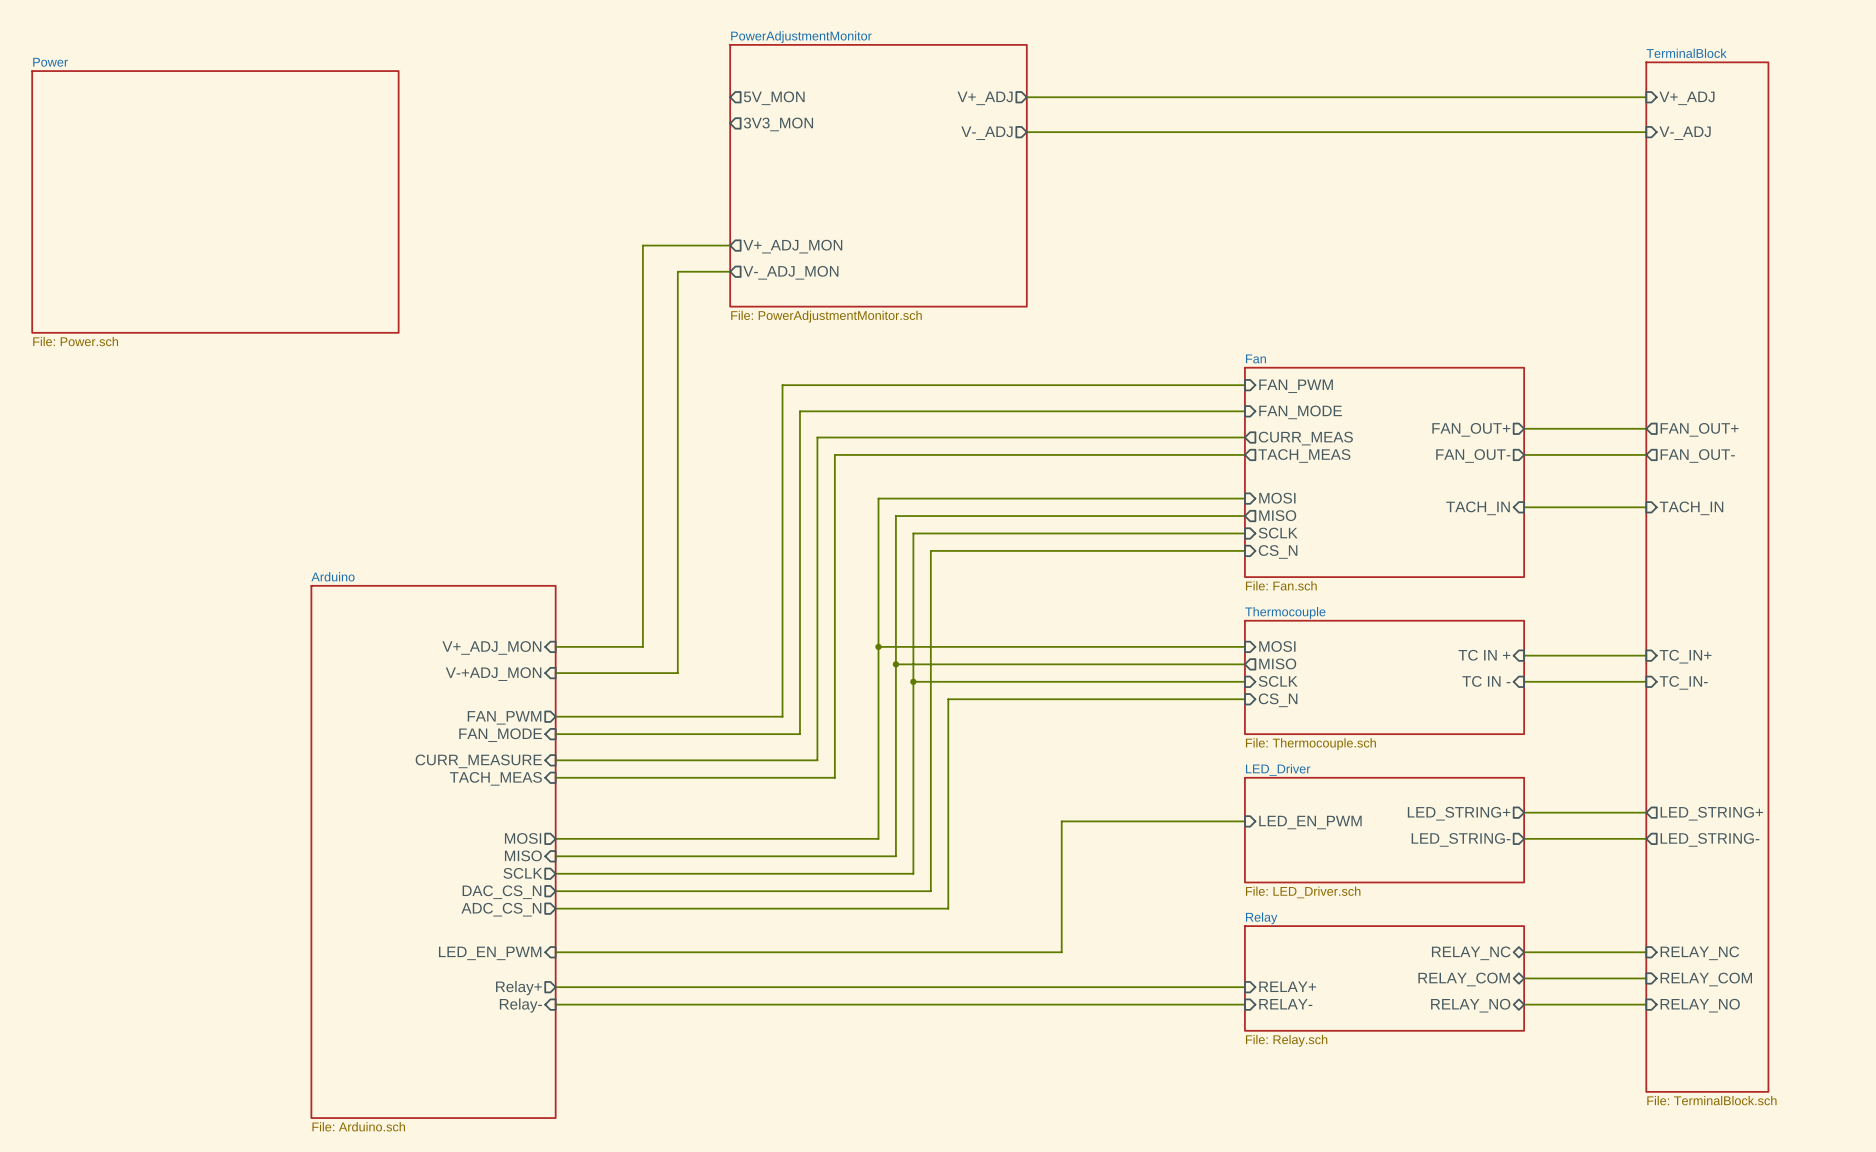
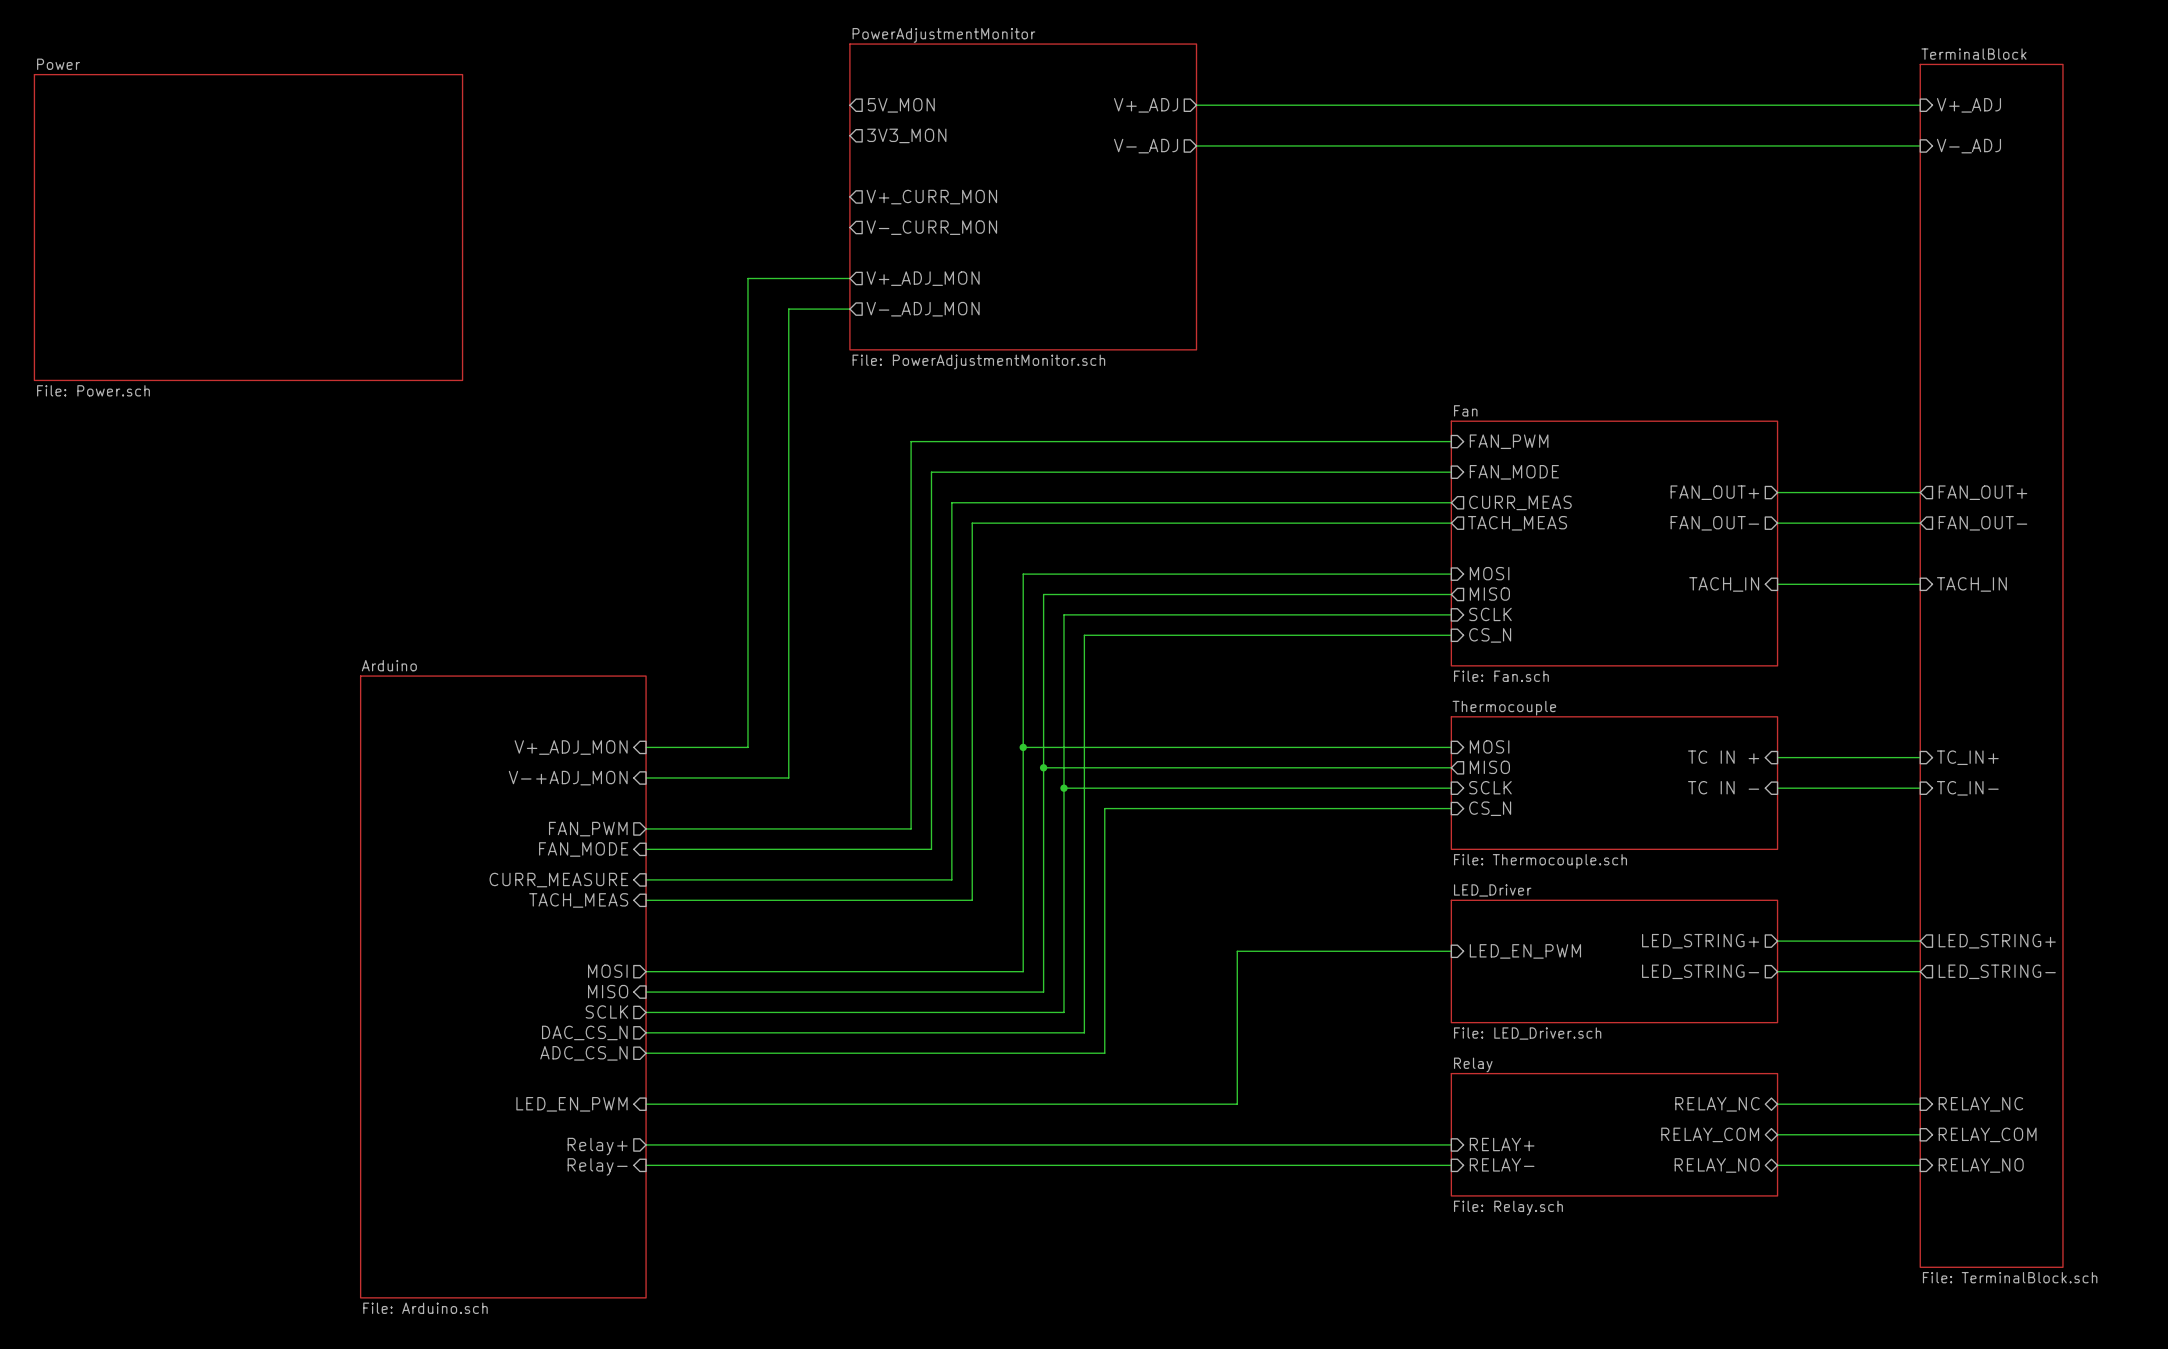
sheet pin: none -> V+_CURR_MON (931, 197)
sheet pin: none -> V-_CURR_MON (931, 227)

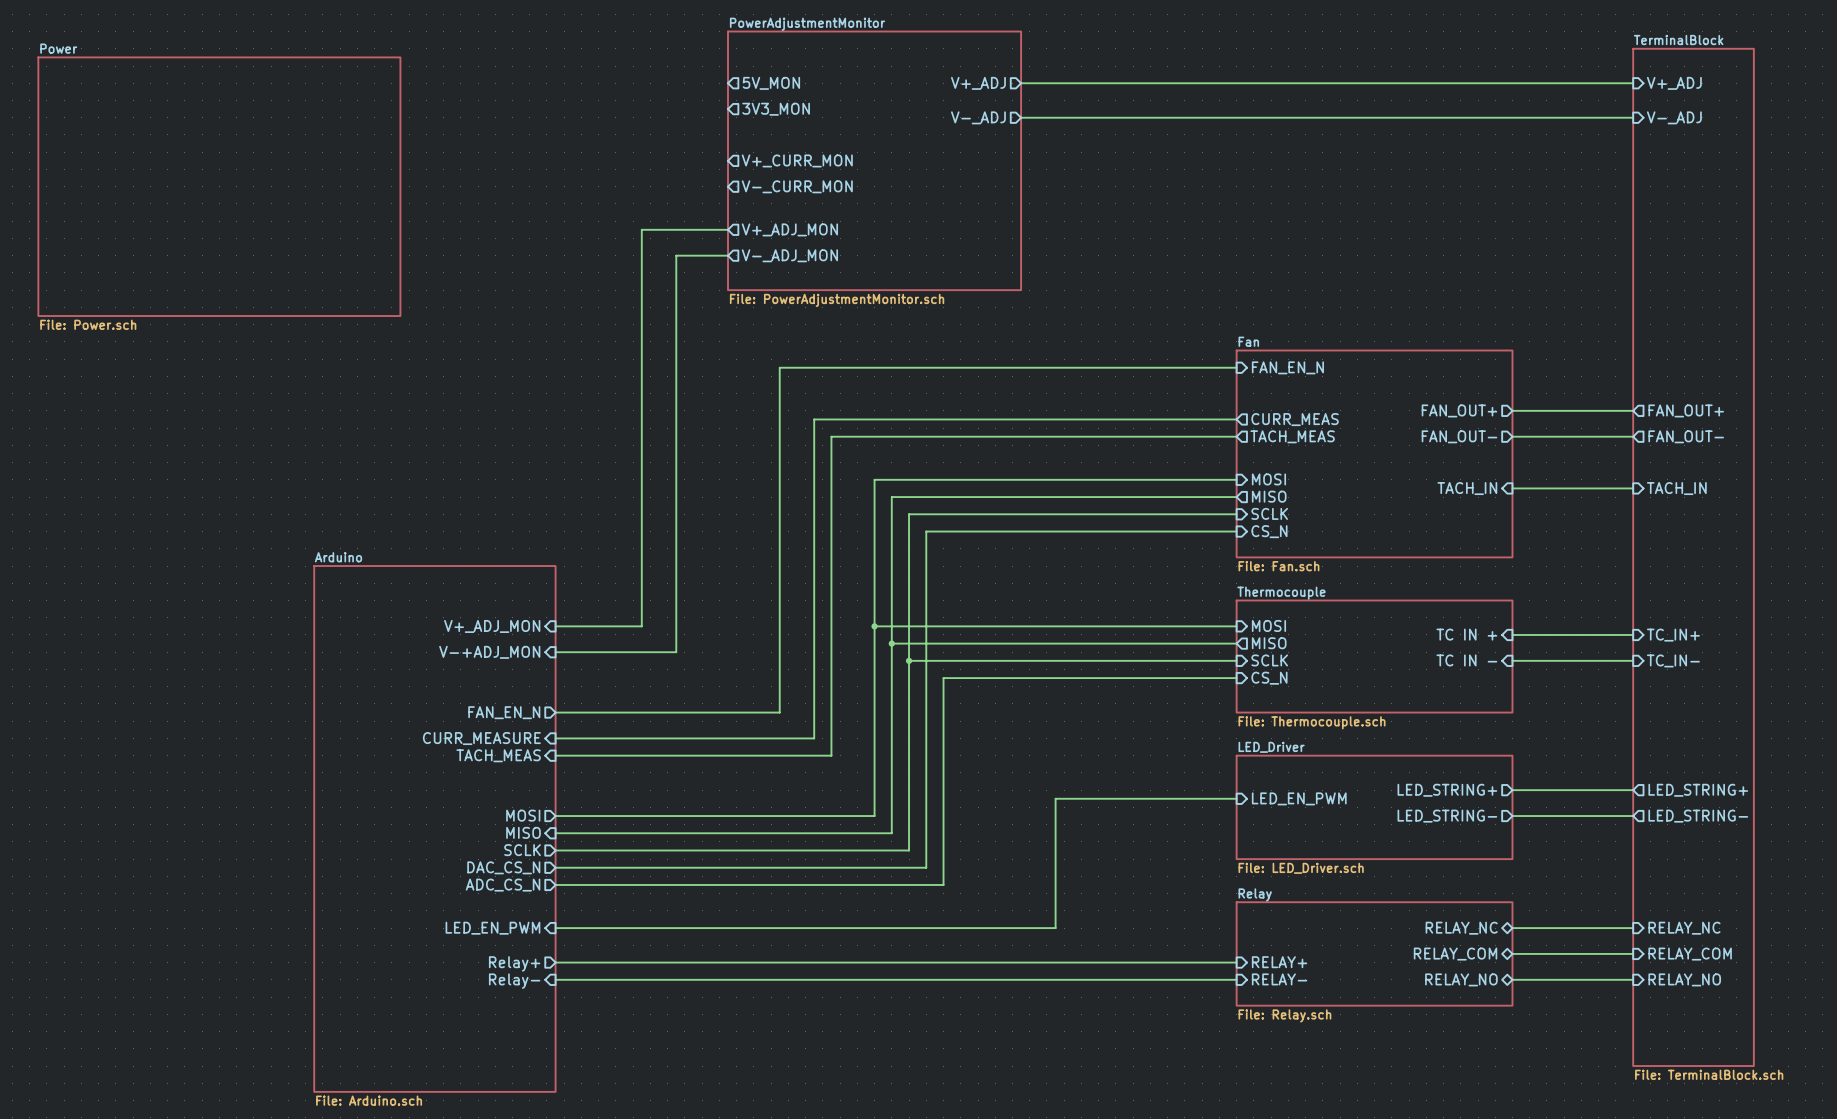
sheet pin: FAN_PWM (1509, 441) -> FAN_EN_N (1287, 367)
wire: (1451, 472) (931, 472) (931, 849) (911, 849) -> none
sheet pin: FAN_MODE (1514, 472) -> none
wire: (646, 828) (911, 828) -> (779, 712) (779, 695)
sheet pin: FAN_PWM (588, 829) -> none
sheet pin shape: input (583, 849) -> output (504, 712)
sheet pin: FAN_MODE (583, 849) -> FAN_EN_N (504, 712)

